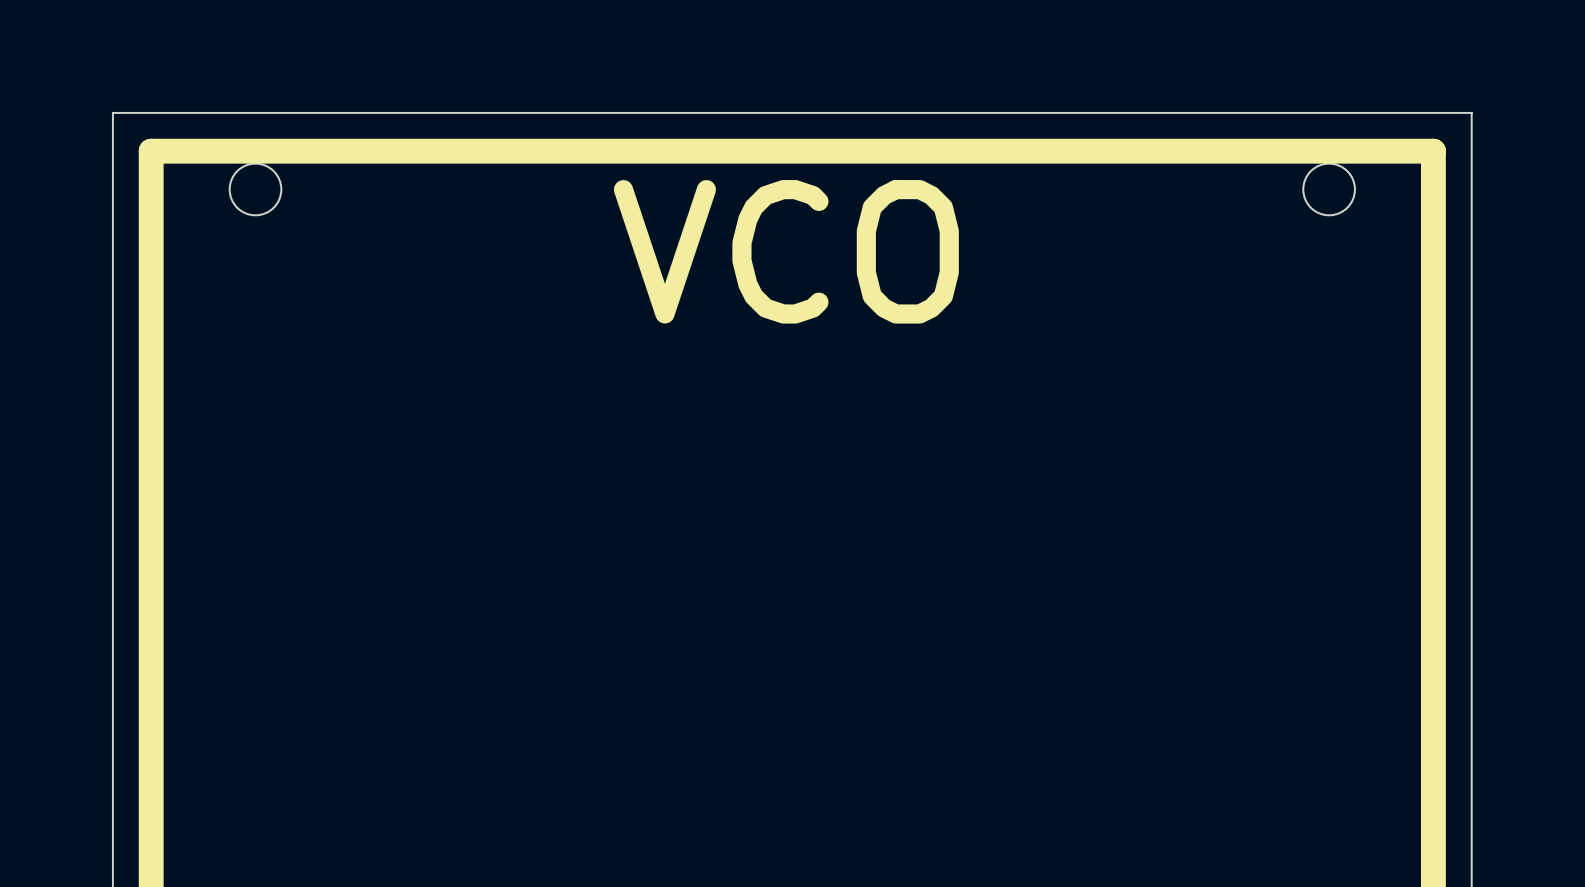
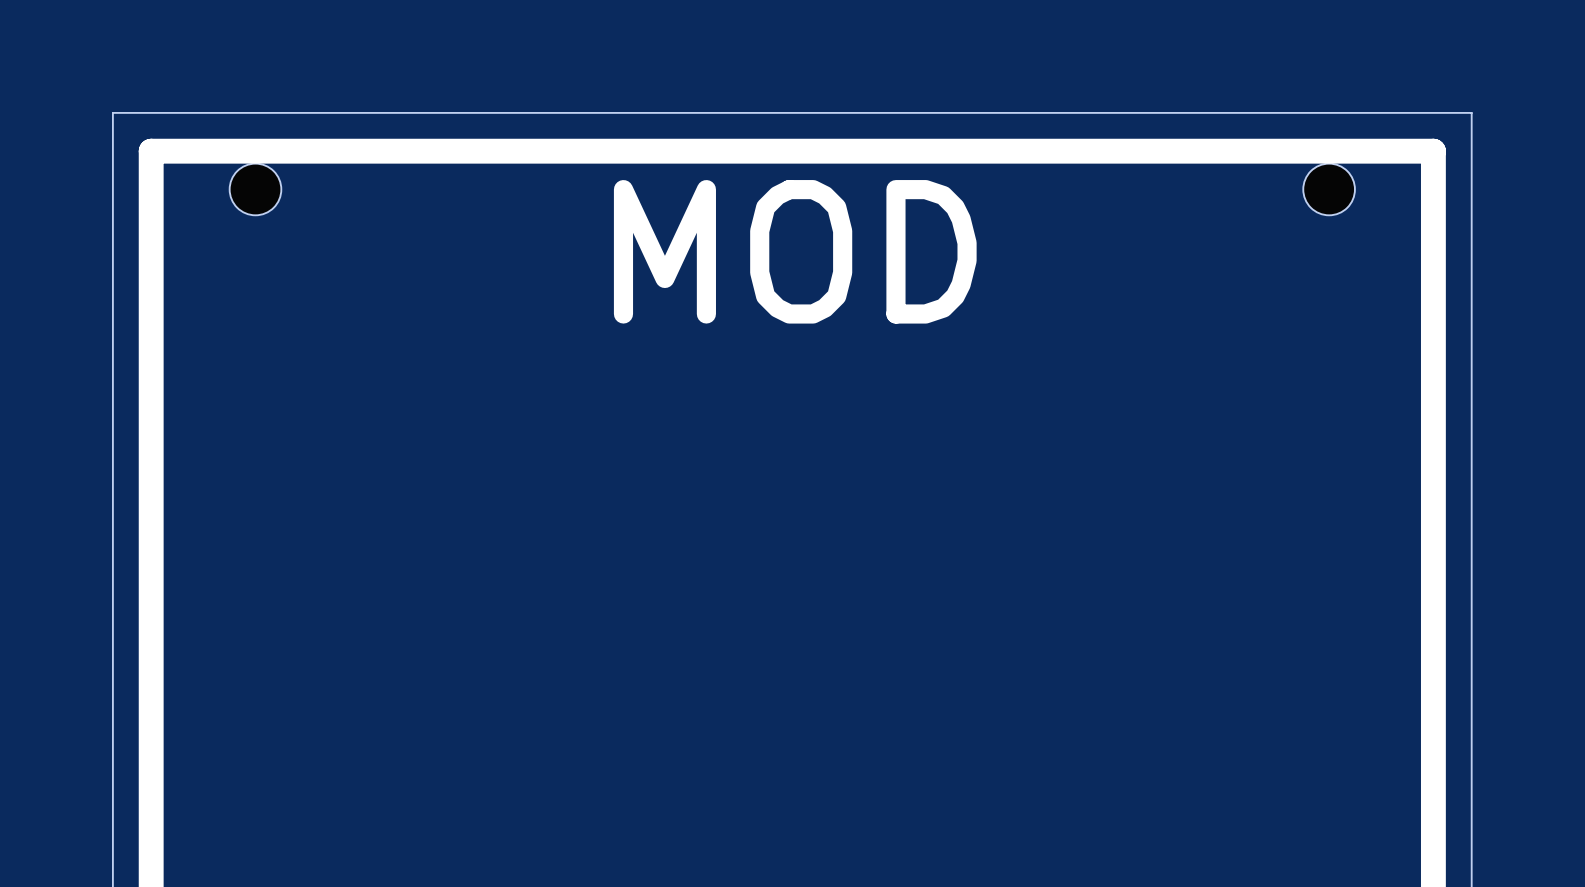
text: VCO (786, 251) -> MOD (795, 251)

